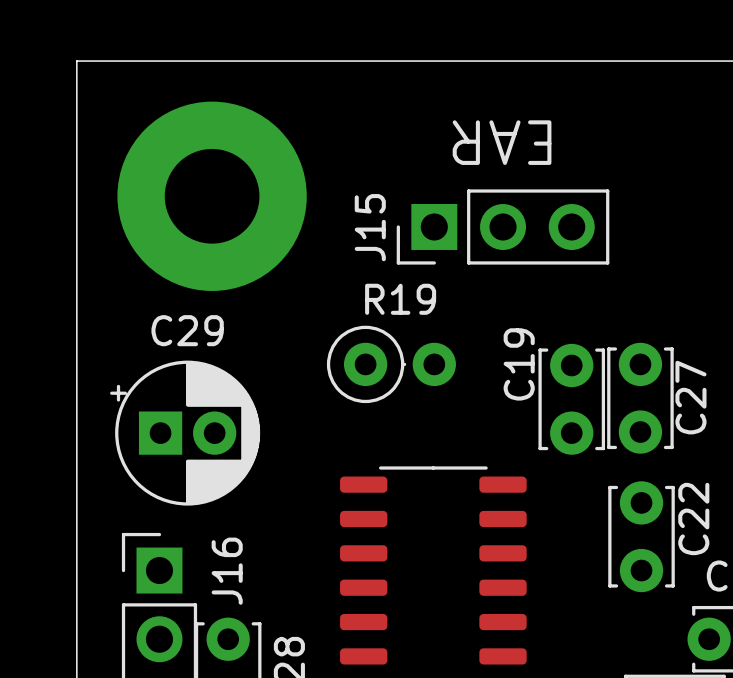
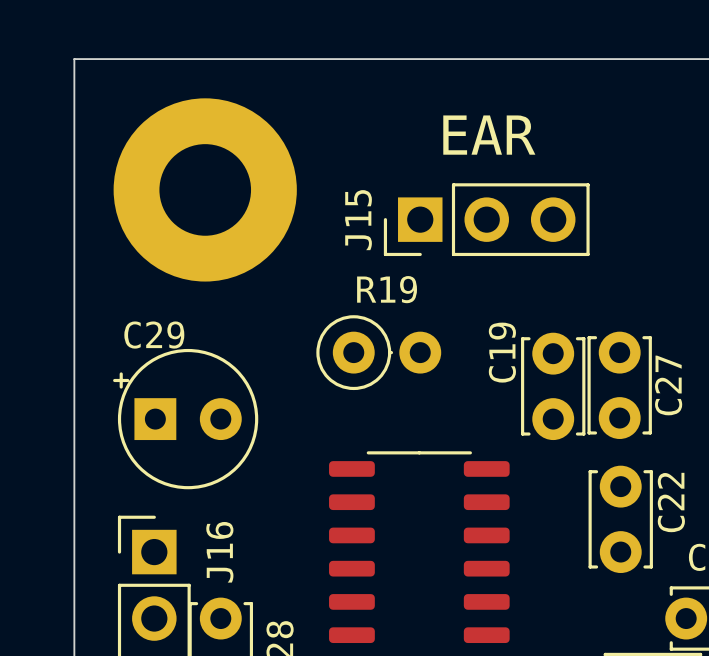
text rotation: 0° (502, 142) -> 180° (489, 135)
C29 footprint: [110, 360, 261, 506] -> [113, 348, 259, 490]

